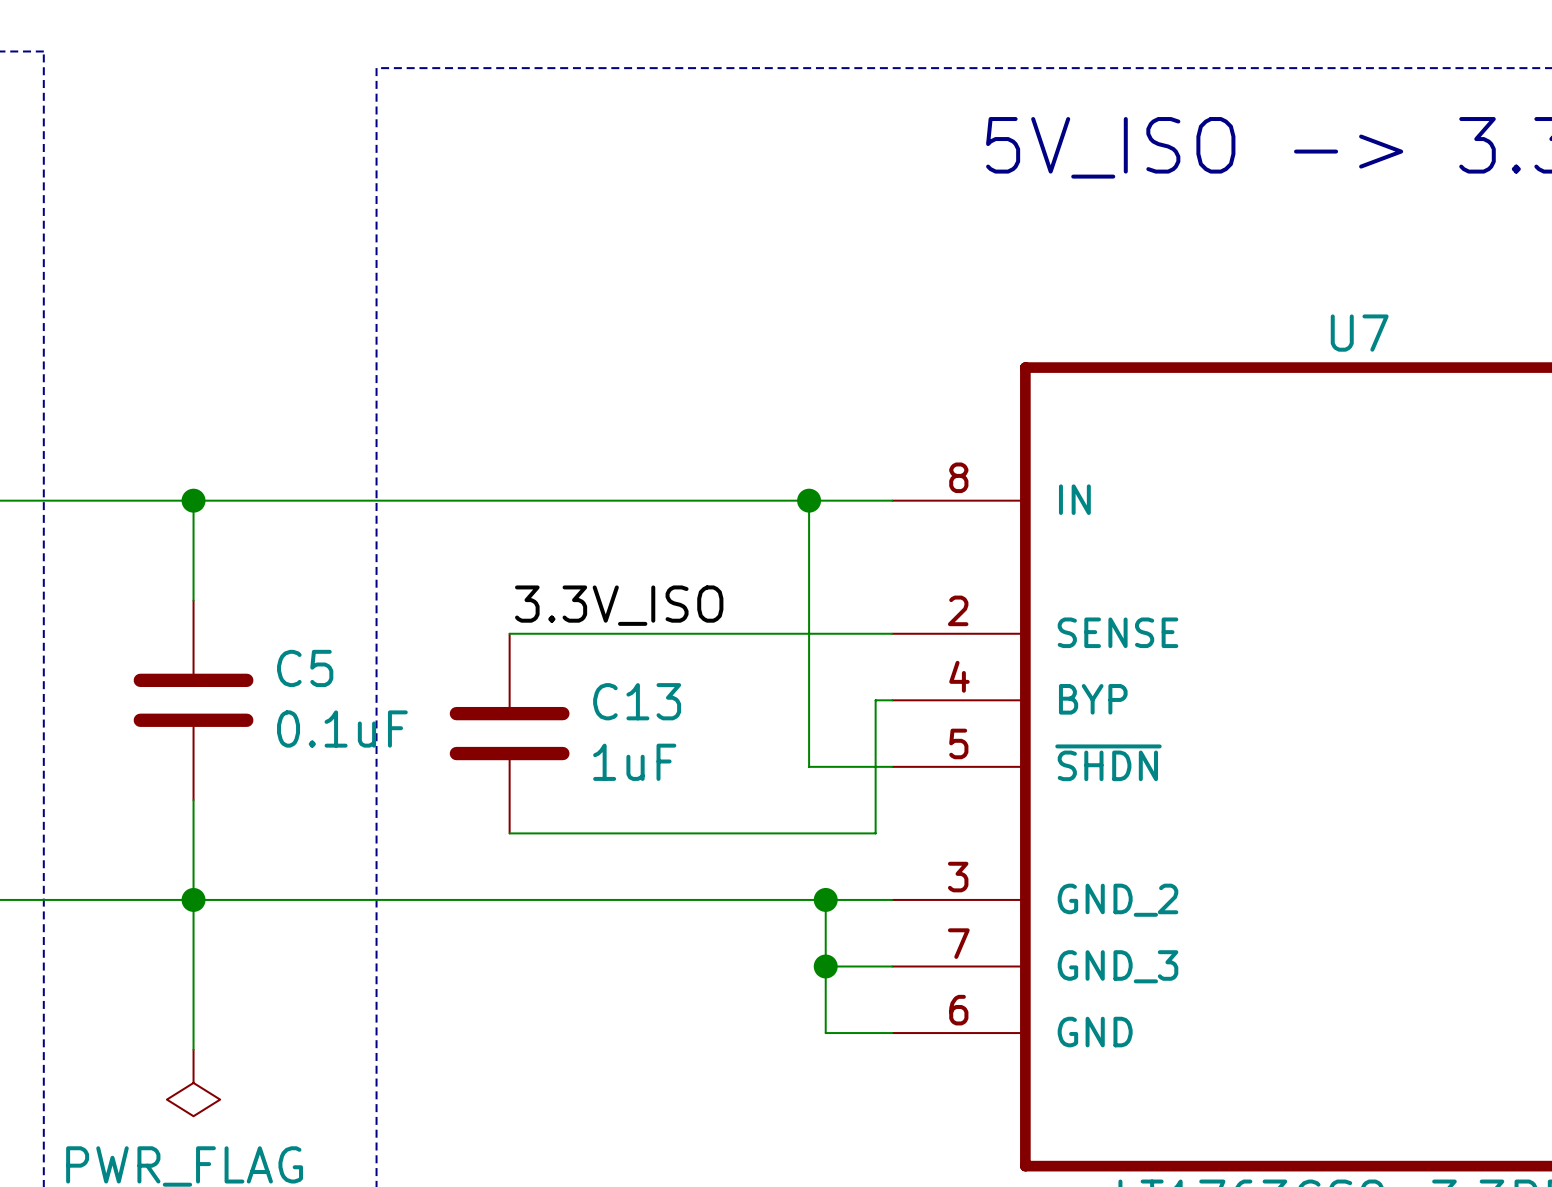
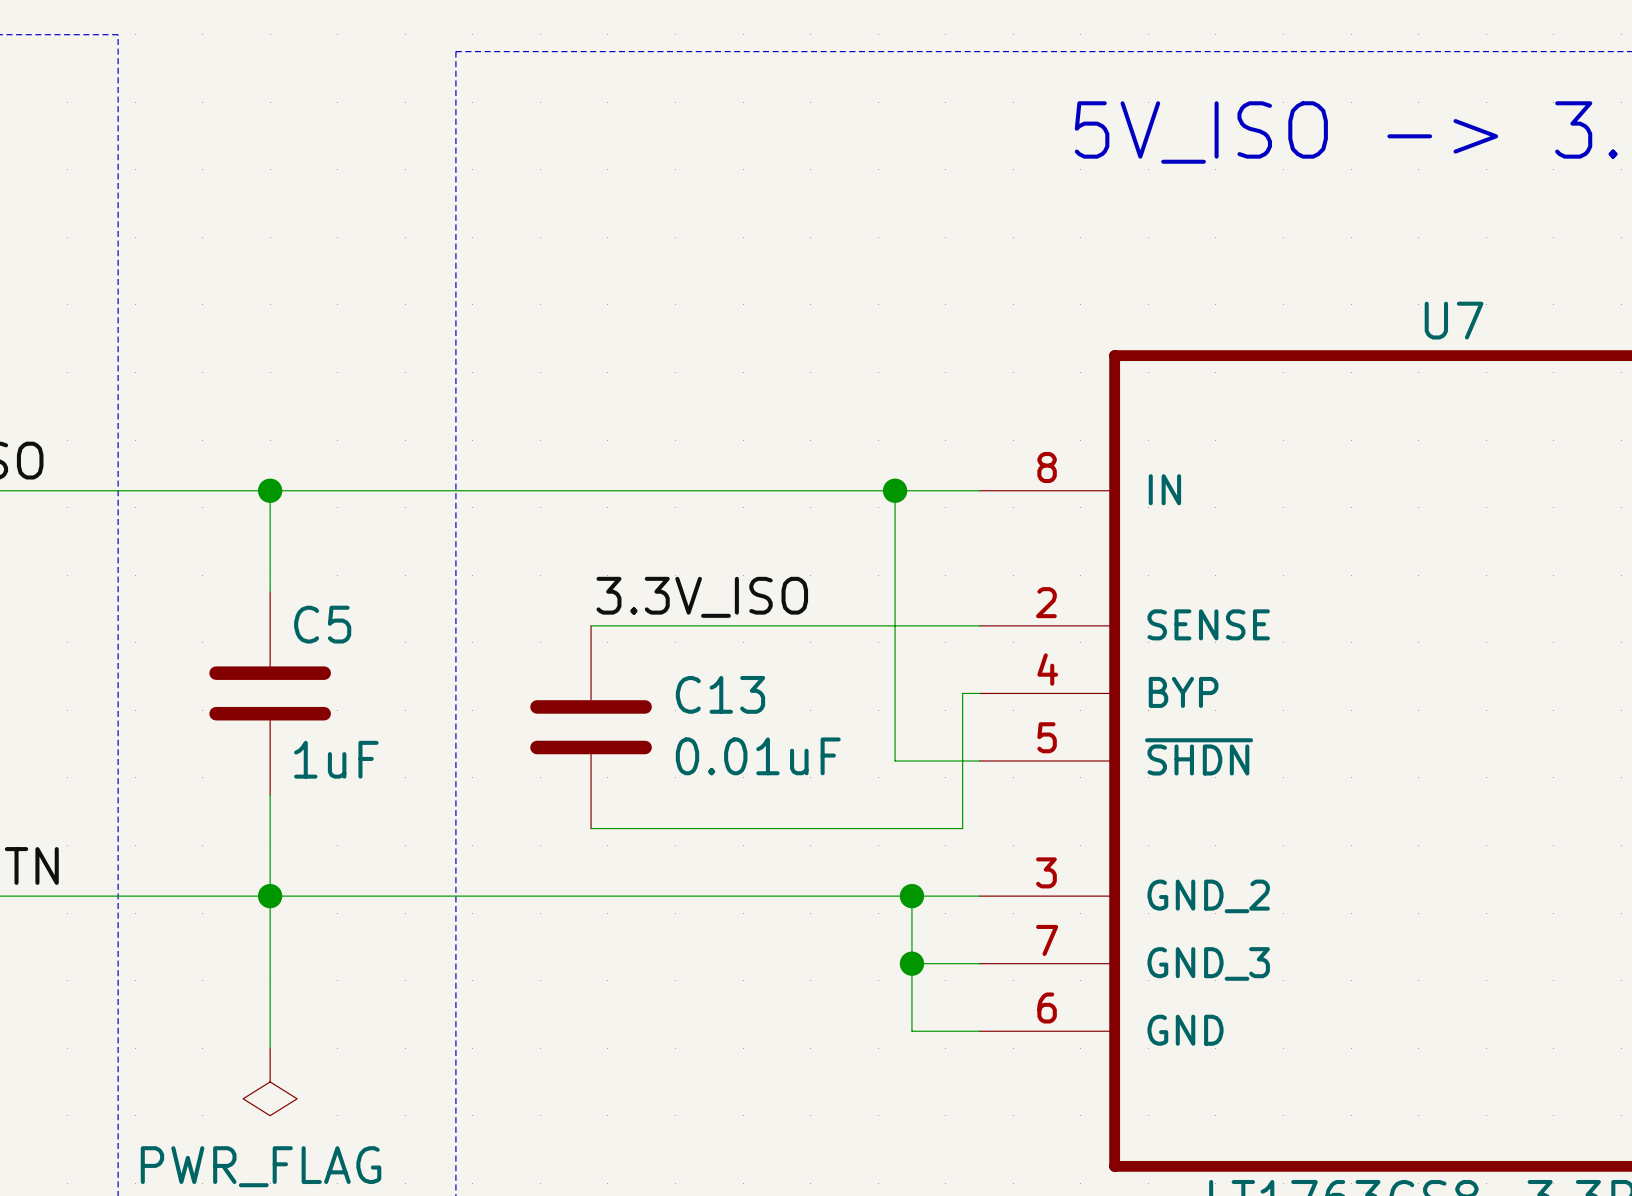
C5 name position: C5 (305, 668) -> C5 (322, 624)
C5 value: 0.1uF (342, 729) -> 1uF (336, 759)
C13 value: 1uF (634, 762) -> 0.01uF (758, 756)

